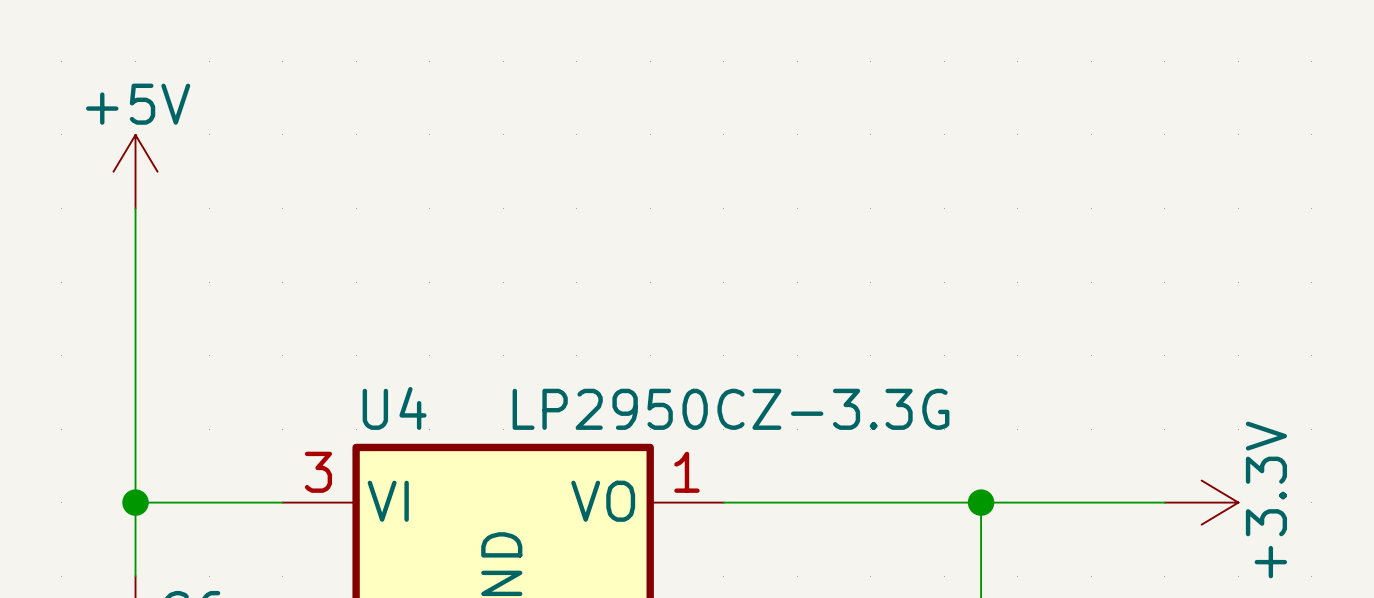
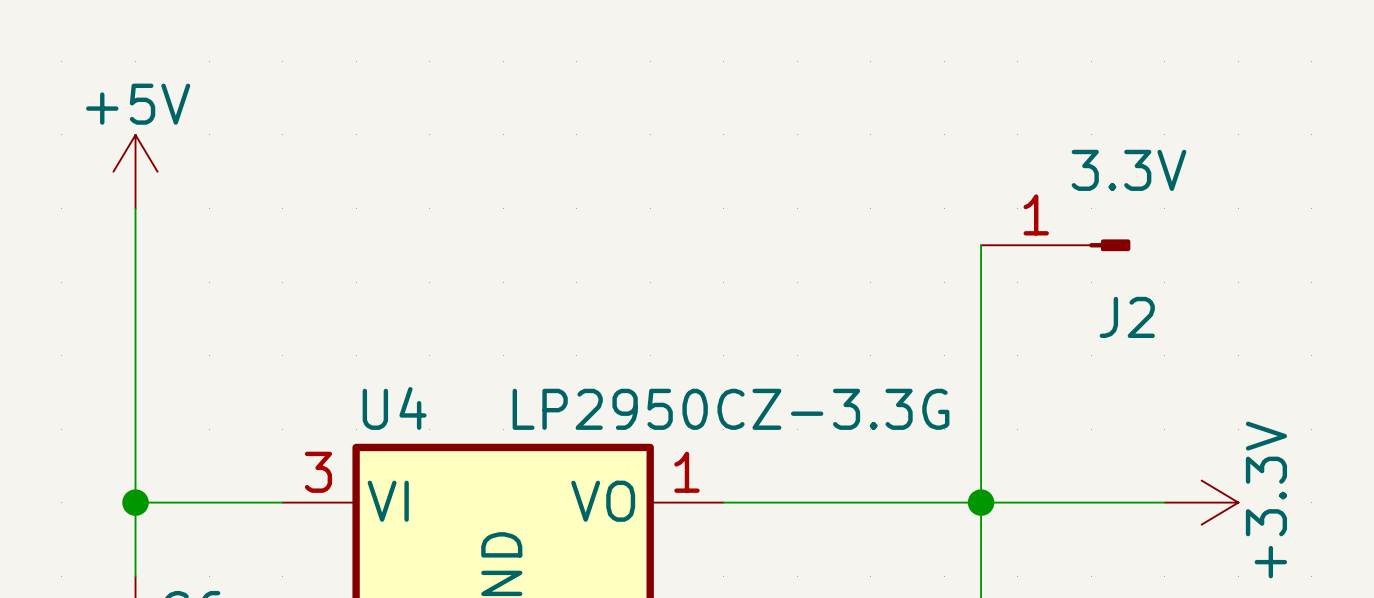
wire: none -> (981, 245) (981, 502)
J2: none -> 3.3V (1055, 245)

